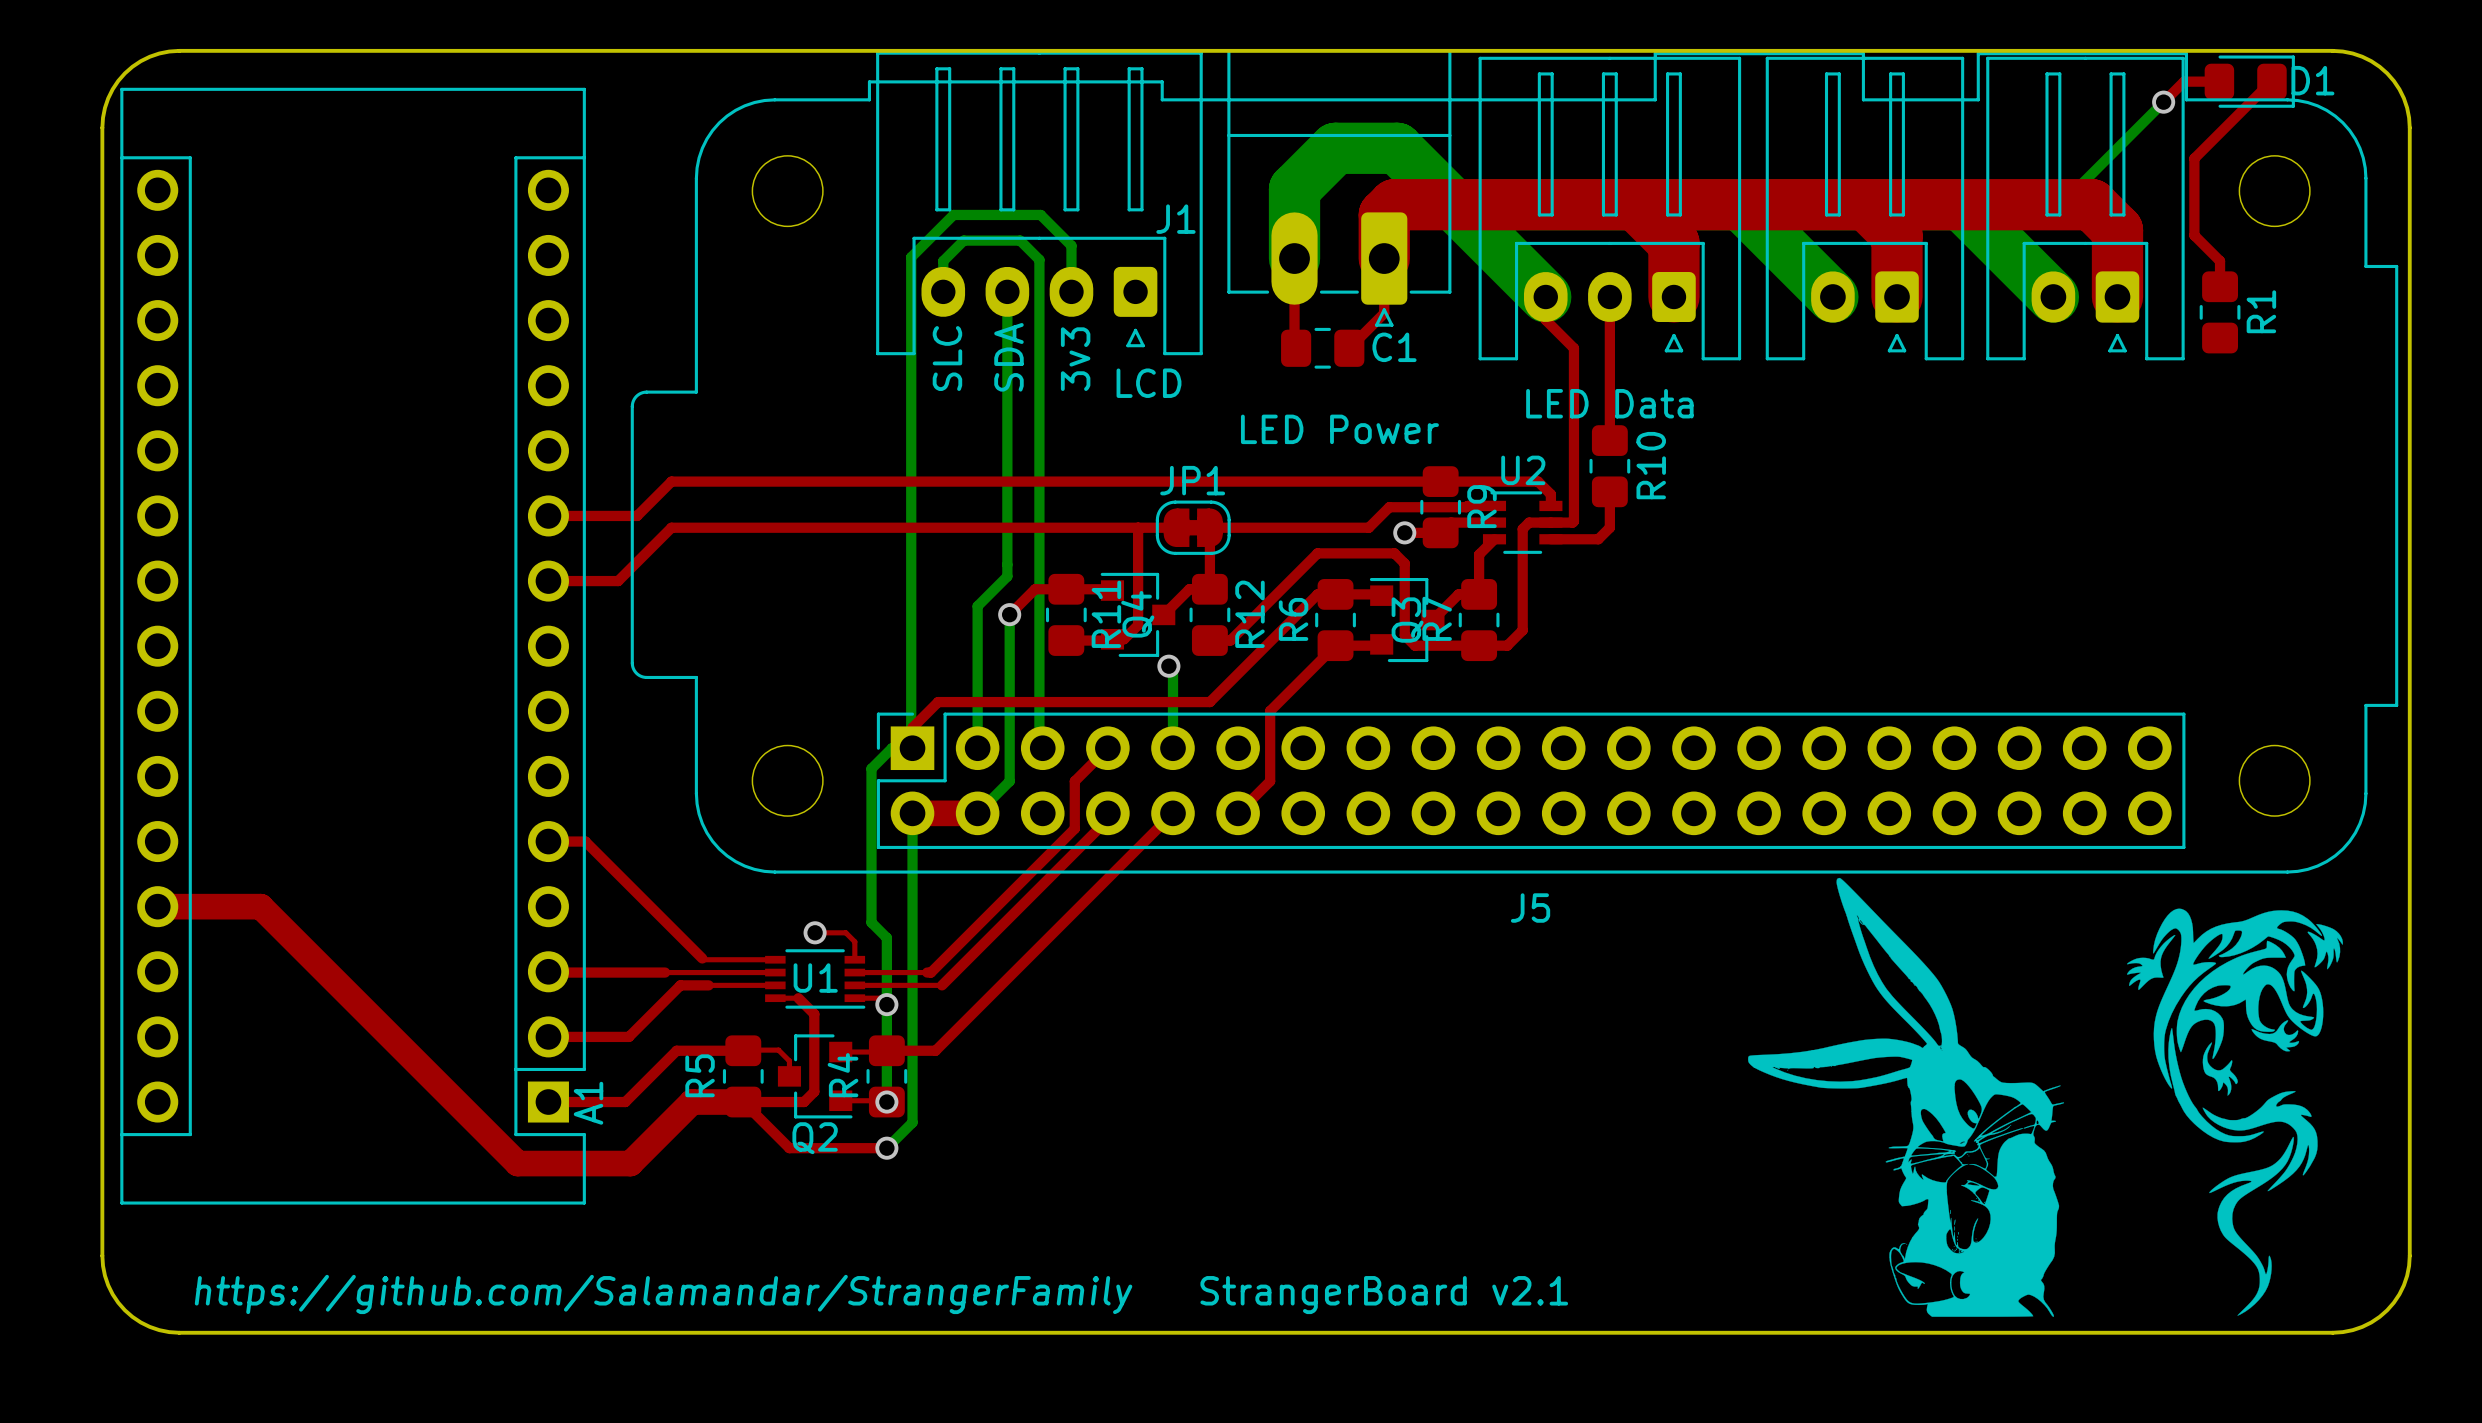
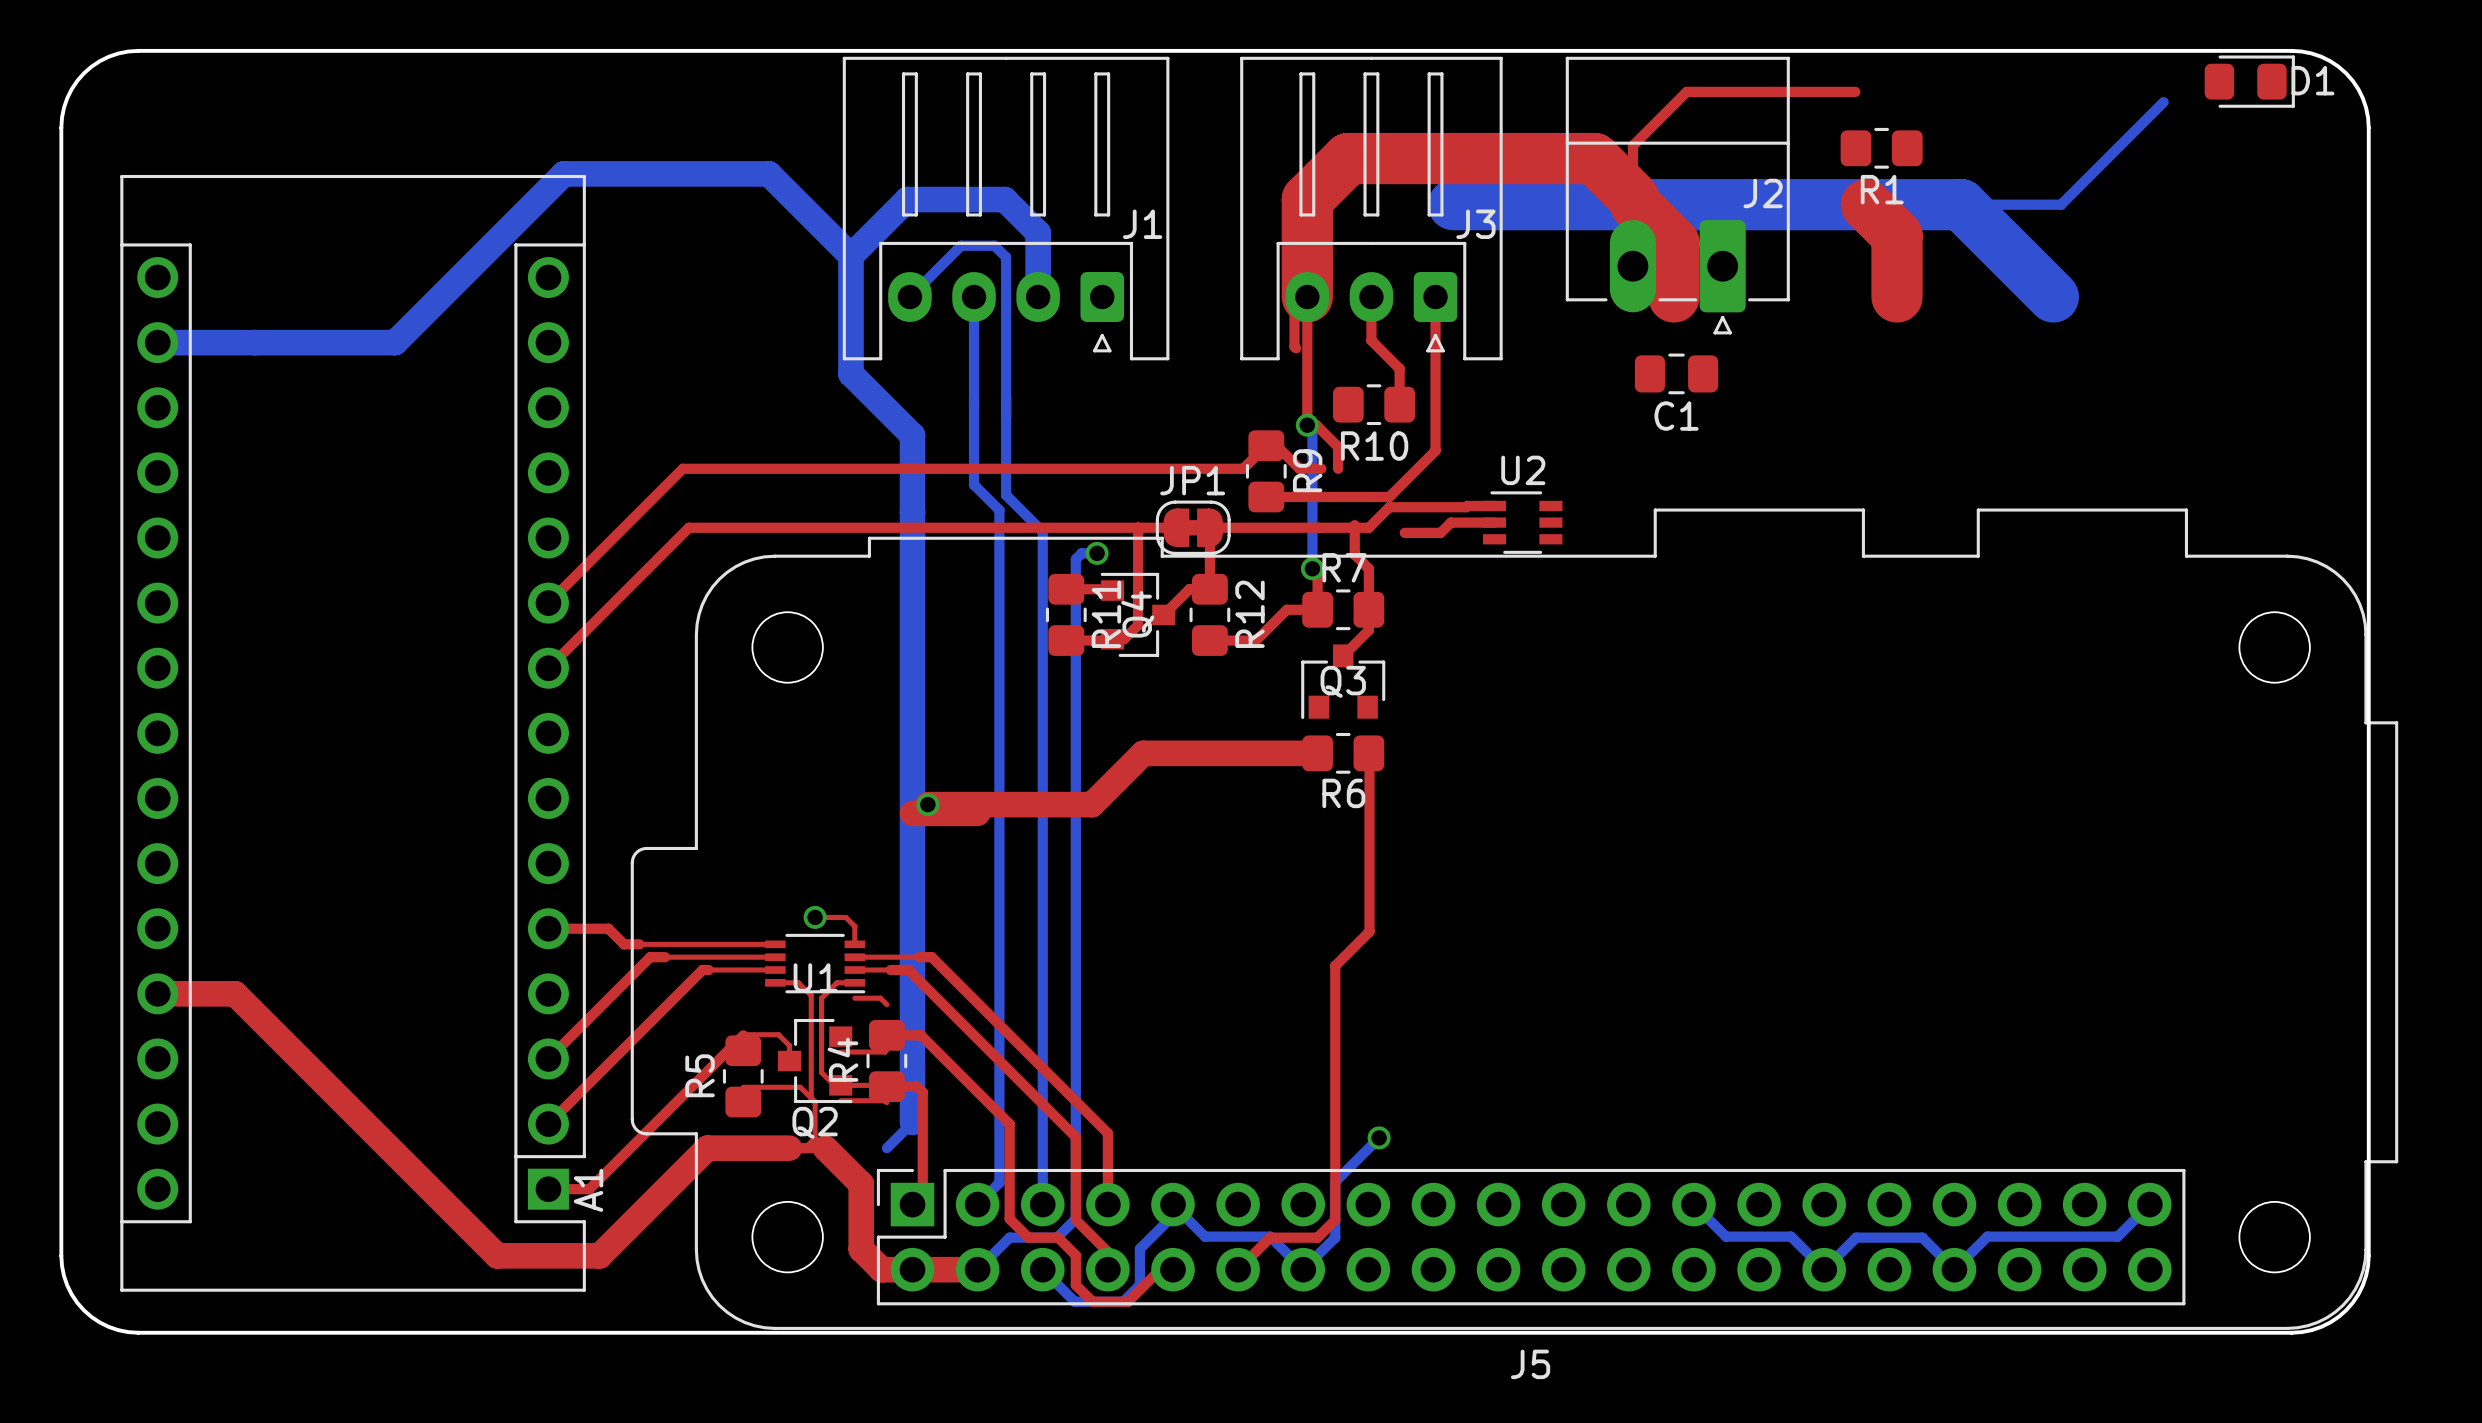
board edge: (179, 50) (149, 56) (124, 73) (108, 98) (102, 127) (102, 1255) (108, 1285) (124, 1310) (149, 1326) (179, 1332) -> (179, 50) (128, 51) (99, 61) (83, 73) (71, 89) (63, 107) (61, 127) (61, 1265) (67, 1285) (77, 1302) (99, 1322) (128, 1332) (179, 1332)
board edge: (2291, 50) (2342, 51) (2371, 61) (2387, 73) (2399, 89) (2407, 107) (2409, 127) (2409, 1265) (2403, 1285) (2393, 1302) (2371, 1322) (2342, 1332) (2291, 1332) -> (2291, 50) (2321, 56) (2346, 73) (2362, 98) (2368, 127) (2368, 1255) (2362, 1285) (2346, 1310) (2321, 1326) (2291, 1332)
top track: (2219, 81) (2184, 81) (2163, 102) -> none
top track: (2271, 81) (2194, 158) (2194, 235) (2220, 261) (2220, 286) -> none
top track: none -> (1855, 91) (1686, 91) (1632, 145) (1632, 197) (1594, 158) (1348, 158) (1307, 199) (1307, 425) (1316, 425) (1338, 446) (1338, 468)
via: (2163, 102) -> none
part: (1339, 187) -> none
J2: none -> (1677, 195)
J1 position: (1039, 203) -> (1006, 208)
bottom track: (1740, 204) (1832, 297) -> none
J3: none -> (1371, 208)
part: (1609, 208) -> none
part: (1864, 208) -> none
part: (2085, 208) -> none
bottom track: none -> (850, 255) (907, 199) (1004, 199) (1038, 232) (1038, 297)
bottom track: none -> (850, 255) (850, 373) (912, 435) (912, 813)
bottom track: none -> (850, 255) (768, 173) (563, 173) (395, 342) (157, 342)
bottom track: (1294, 258) (1294, 189) (1335, 148) (1397, 148) (1545, 297) -> none
bottom track: (943, 291) (943, 261) (963, 240) (1020, 240) (1039, 259) (1039, 744) (1042, 748) -> none
bottom track: (1007, 291) (1007, 576) (977, 606) (977, 748) -> none
bottom track: (1071, 291) (1071, 245) (1040, 214) (953, 214) (911, 257) (912, 748) (892, 748) (871, 768) (871, 922) (886, 937) (886, 1102) -> none
bottom track: none -> (909, 297) (961, 245) (994, 245) (1006, 257) (1006, 495) (1042, 531) (1042, 1204)
bottom track: none -> (974, 297) (974, 484) (999, 510) (999, 1182) (977, 1204)
top track: none -> (1371, 297) (1371, 340) (1399, 368) (1399, 404)
top track: none -> (1435, 297) (1435, 450) (1389, 496) (1266, 496)
top track: (1545, 297) (1545, 320) (1573, 348) (1573, 521) (1529, 522) (1522, 529) (1522, 630) (1507, 645) (1415, 645) (1404, 635) (1404, 563) (1394, 553) (1317, 553) (1230, 640) -> (1312, 568) (1317, 573) (1317, 609) (1286, 609) (1256, 640) (1230, 640)
top track: (1609, 297) (1609, 440) -> none
top track: (2117, 297) (2117, 230) (2091, 204) (1394, 204) (1384, 214) (1384, 313) (1349, 348) -> none
R1 rotation: 0° (2220, 312) -> 90° clockwise (1881, 148)
R1 position: (2220, 312) -> (1881, 148)
C1 name position: C1 (1394, 347) -> C1 (1676, 416)
C1 position: (1322, 348) -> (1676, 373)
text: SDA (1008, 357) -> none
text: SLC (947, 358) -> none
text: 3v3 (1075, 359) -> none
text: LCD (1148, 383) -> none
text: LED Data (1609, 403) -> none
bottom track: none -> (1307, 425) (1312, 430) (1312, 568)
via: none -> (1307, 425)
text: LED Power (1339, 429) -> none
J5 position: (1514, 462) -> (1514, 919)
R10 rotation: 0° (1609, 466) -> 90° clockwise (1373, 404)
R10 position: (1609, 466) -> (1373, 404)
top track: none -> (1321, 468) (1299, 468) (1276, 445) (1266, 445) (1243, 468) (682, 468) (548, 603)
top track: (1609, 491) (1609, 527) (1598, 539) (1550, 539) -> none
top track: (1550, 505) (1550, 494) (1538, 481) (671, 481) (637, 515) (548, 515) -> none
R9 position: (1440, 507) -> (1266, 471)
top track: none -> (1354, 525) (1354, 554) (1368, 568) (1368, 630) (1343, 655)
top track: (688, 527) (671, 527) (618, 581) (548, 581) -> (688, 527) (548, 668)
via: (1404, 532) -> none
top track: (1494, 539) (1479, 554) (1479, 594) (1458, 594) (1432, 620) -> none
bottom track: none -> (1097, 553) (1081, 553) (1075, 559) (1075, 1218) (1057, 1237) (1009, 1237) (977, 1269)
via: none -> (1097, 553)
via: none -> (1312, 568)
top track: (1066, 589) (1035, 589) (1009, 614) -> none
top track: (1381, 595) (1317, 594) (1209, 702) (938, 702) (912, 727) (912, 748) -> none
bottom track: (1009, 614) (1009, 781) (977, 813) -> none
via: (1009, 614) -> none
R6 name position: R6 (1293, 619) -> R6 (1343, 793)
R6 rotation: 0° (1335, 620) -> 90° clockwise (1343, 753)
R6 position: (1335, 620) -> (1343, 753)
Q3 rotation: 0° (1407, 620) -> 90° counterclockwise (1343, 681)
Q3 position: (1407, 620) -> (1343, 681)
R7 rotation: 0° (1479, 620) -> 90° clockwise (1343, 609)
R7 position: (1479, 620) -> (1343, 609)
top track: (1381, 644) (1335, 645) (1270, 711) (1270, 781) (1238, 813) -> none
A1 position: (353, 646) -> (353, 733)
bottom track: (1168, 666) (1172, 670) (1172, 748) -> none
via: (1168, 666) -> none
top track: (1107, 748) (1074, 781) (1074, 828) (930, 972) (854, 972) -> none
top track: none -> (1316, 753) (1143, 753) (1091, 804) (927, 804)
top track: none -> (1369, 753) (1369, 931) (1335, 965) (1335, 1219) (1317, 1237) (1270, 1237) (1238, 1269)
via: none -> (927, 804)
bottom track width: thin (912, 813) (912, 1122) -> thick (912, 813) (912, 1122)
top track: (1107, 813) (1107, 819) (941, 985) (854, 985) -> none
top track: (1172, 813) (935, 1050) (886, 1050) -> none
top track: (548, 841) (585, 841) (703, 959) (775, 959) -> none
drawing: [1748, 877, 2065, 1317] -> none
top track: (157, 906) (260, 906) (517, 1163) (630, 1163) (692, 1102) (743, 1102) -> none
drawing: [2127, 908, 2343, 1316] -> none
top track: none -> (548, 928) (608, 928) (624, 944) (775, 944)
top track: (815, 932) (845, 932) (854, 941) -> (815, 917) (845, 917) (854, 926) (854, 941)
via position: (815, 932) -> (815, 917)
top track: (854, 944) (854, 959) -> none
top track: none -> (775, 957) (650, 957) (548, 1058)
top track: none -> (854, 957) (931, 957) (1107, 1133) (1107, 1204)
top track: none -> (775, 969) (702, 969) (548, 1124)
top track: none -> (854, 969) (908, 969) (1075, 1137) (1075, 1219) (1107, 1252) (1107, 1269)
top track: (548, 971) (775, 972) -> none
U1 position: (815, 978) -> (815, 963)
top track: none -> (775, 982) (798, 982) (811, 995) (811, 1098)
top track: none -> (854, 982) (836, 982) (821, 998) (821, 1072) (834, 1085) (884, 1085) (886, 1087)
top track: (775, 985) (680, 985) (628, 1036) (548, 1036) -> none
top track: (775, 998) (798, 998) (814, 1014) (814, 1091) (804, 1102) (743, 1102) -> none
via: (886, 1004) -> none
top track: none -> (743, 1035) (589, 1189) (548, 1189)
top track: none -> (886, 1035) (920, 1035) (1009, 1124) (1009, 1218) (1028, 1237) (1058, 1237) (1075, 1255) (1075, 1285) (1092, 1301) (1128, 1301) (1172, 1256) (1172, 1269)
top track: (743, 1050) (778, 1050) (789, 1061) (789, 1076) -> (743, 1034) (778, 1034) (789, 1045) (789, 1061)
top track: (743, 1050) (676, 1050) (625, 1102) (548, 1102) -> none
Q2 position: (815, 1076) -> (815, 1061)
R4 position: (886, 1076) -> (886, 1061)
top track: none -> (886, 1086) (917, 1086) (922, 1092) (922, 1194) (912, 1204)
top track: none -> (743, 1087) (800, 1087) (815, 1102) (815, 1137) (804, 1148)
top track: (743, 1102) (789, 1148) -> (157, 993) (235, 993) (497, 1255) (599, 1255) (707, 1148) (789, 1148)
via: (886, 1102) -> none
bottom track: none -> (1379, 1137) (1335, 1181) (1335, 1237) (1303, 1269) (1270, 1236) (1205, 1236) (1172, 1204) (1172, 1215) (1139, 1248) (1139, 1285) (1123, 1301) (1074, 1301) (1042, 1269)
via: none -> (1379, 1137)
top track: (825, 1148) (886, 1148) -> (825, 1148) (861, 1184) (861, 1249) (881, 1269) (977, 1269)
via: (886, 1148) -> none
bottom track: none -> (1693, 1204) (1726, 1236) (1791, 1236) (1824, 1269) (1856, 1237) (1922, 1237) (1954, 1269) (1987, 1236) (2117, 1236) (2149, 1204)
text: https://github.com/Salamandar/StrangerFamily (663, 1294) -> none
text: StrangerBoard v2.1 (1384, 1295) -> none

